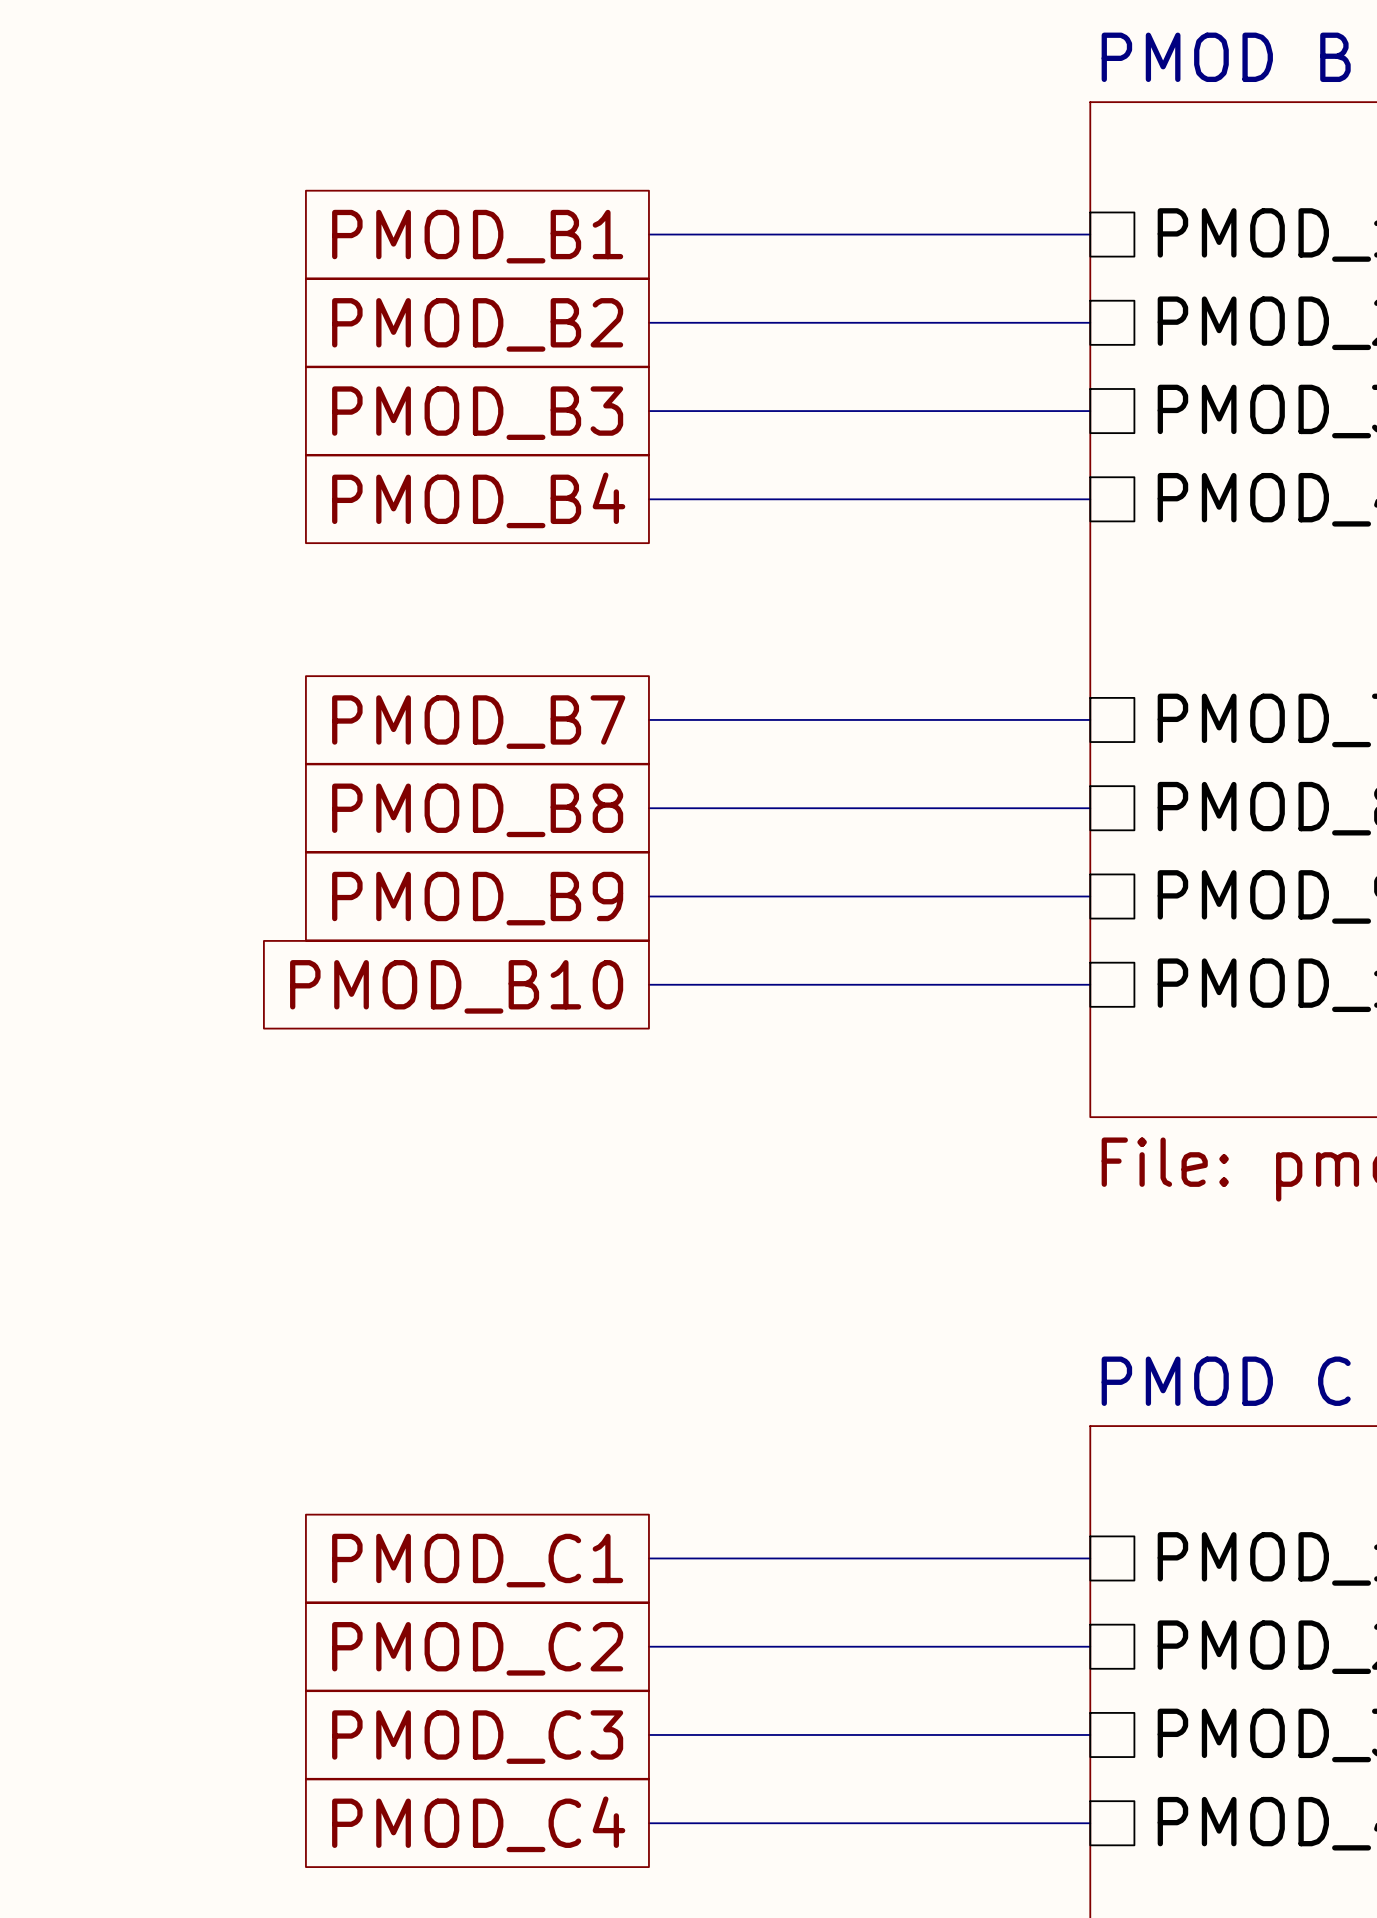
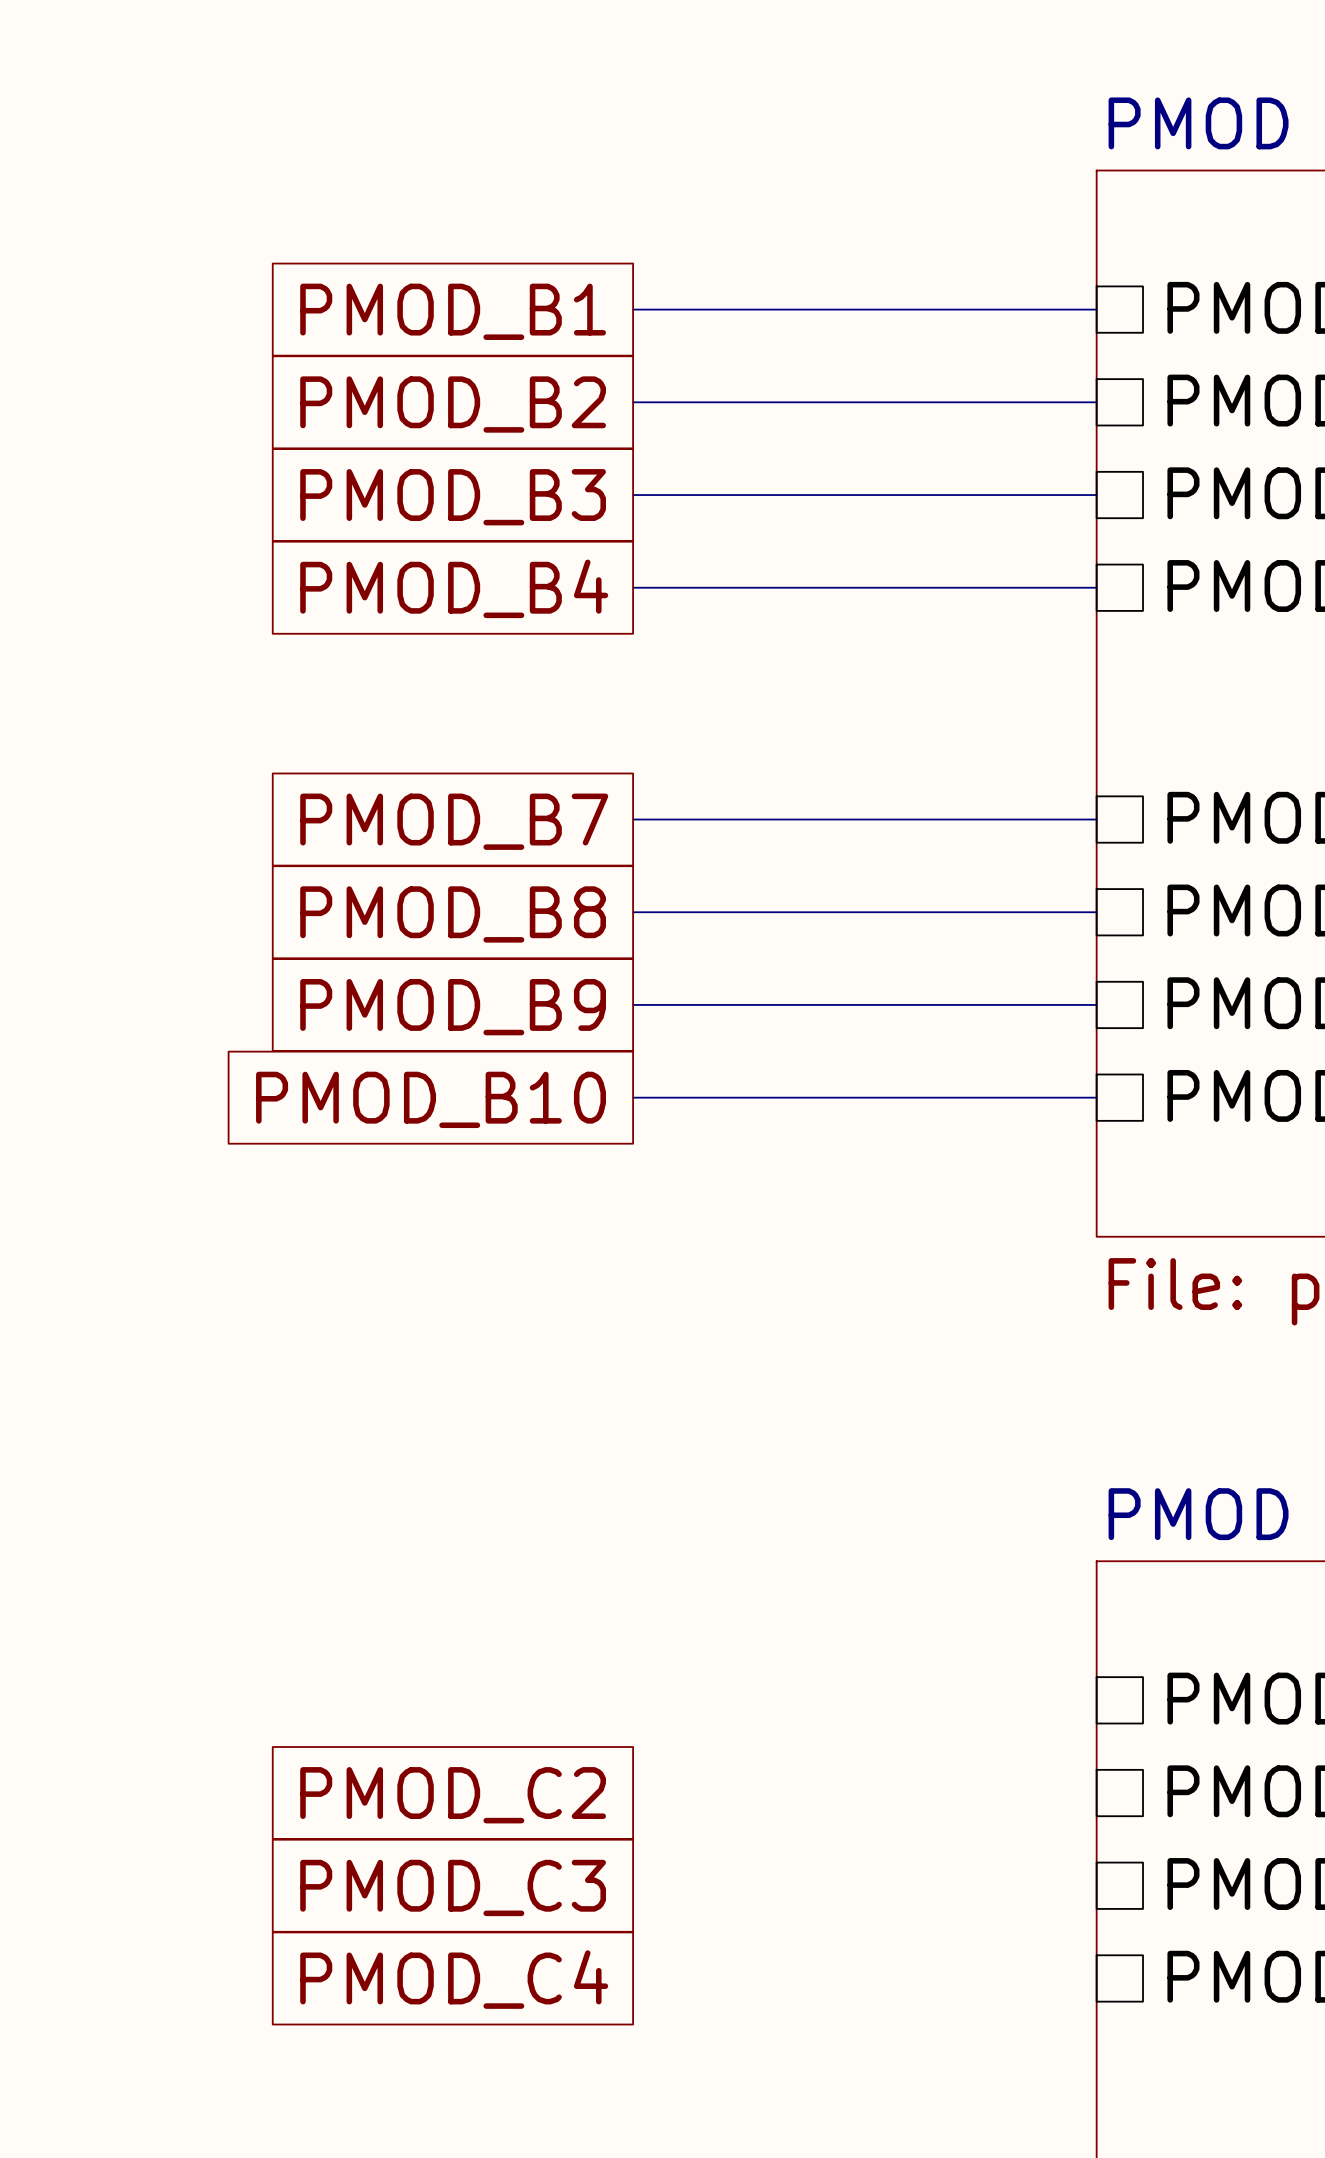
wire: (648, 1558) (1090, 1558) -> none
global label: PMOD_C1 (477, 1560) -> none
wire: (648, 1646) (1090, 1646) -> none
wire: (648, 1734) (1090, 1734) -> none
wire: (648, 1823) (1090, 1823) -> none

